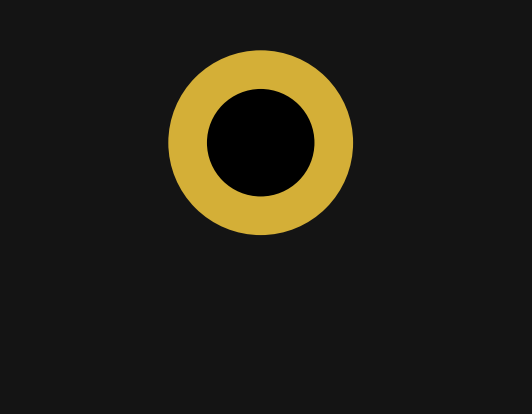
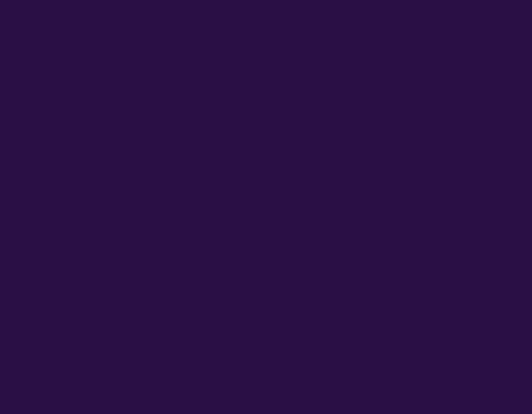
part: (260, 142) -> none

